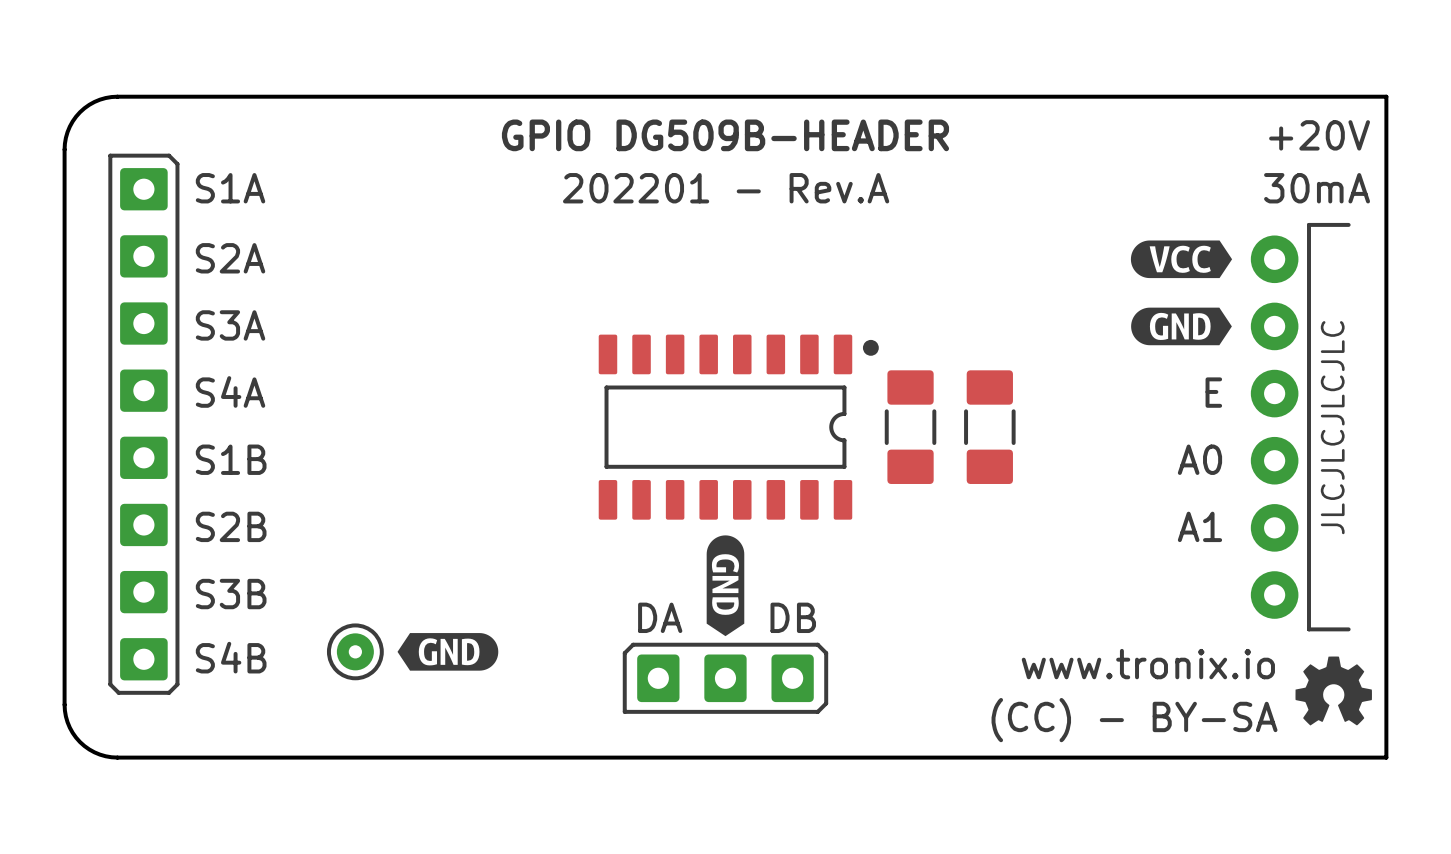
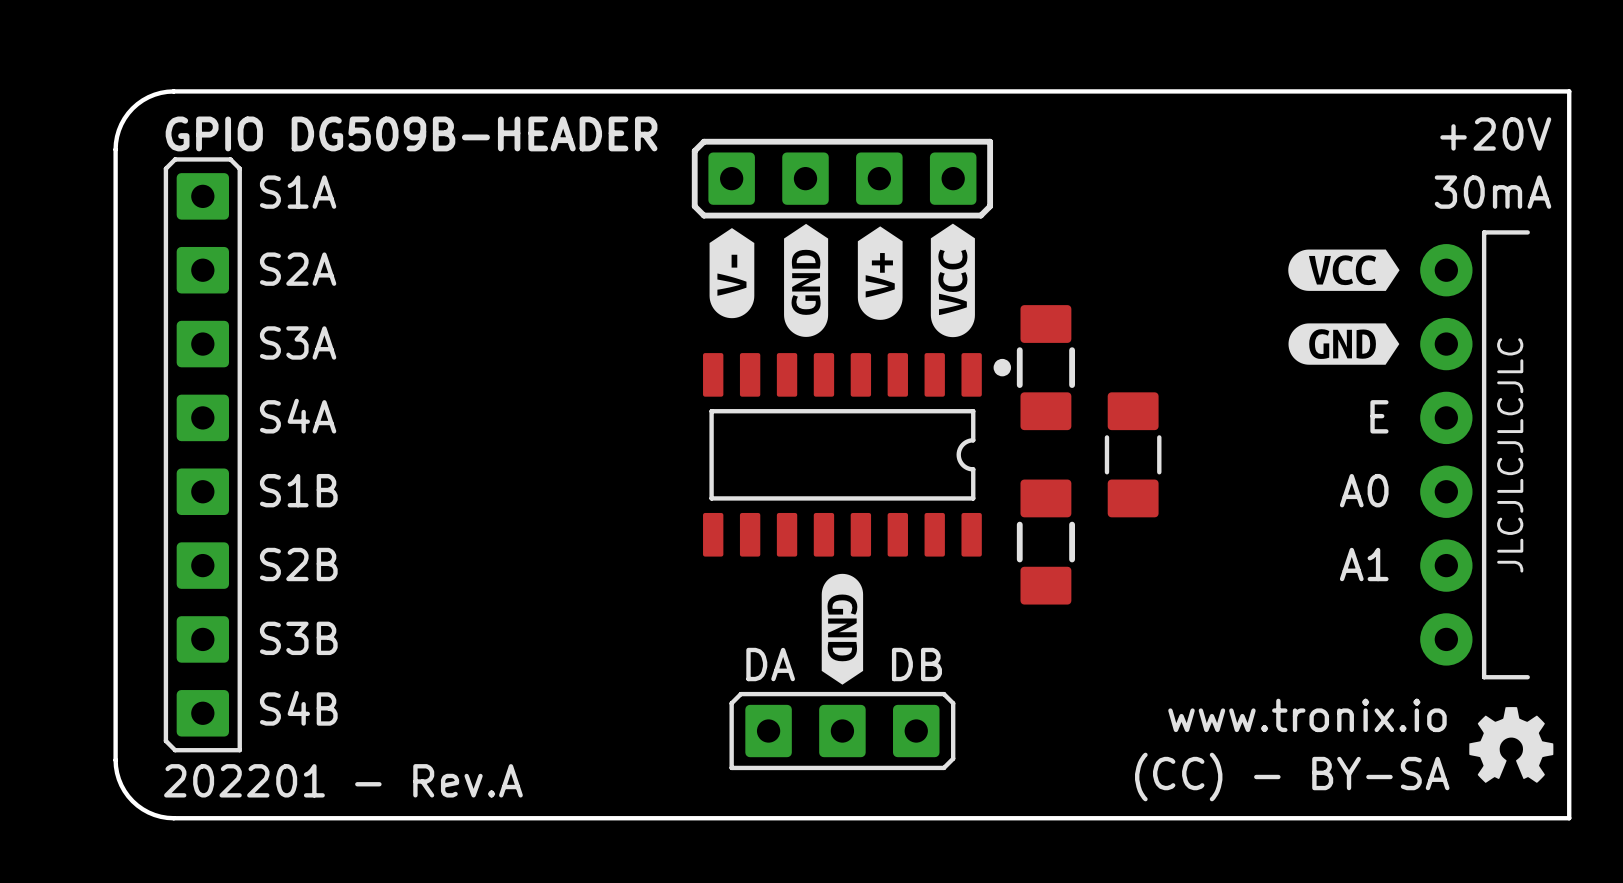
text position: GPIO DG509B-HEADER (725, 135) -> GPIO DG509B-HEADER (411, 133)
part: none -> (842, 178)
text: 202201 - Rev.A (726, 188) -> none
drawing: none -> [709, 223, 975, 338]
part: none -> (1045, 367)
part rotation: 0° (143, 424) -> 180° (202, 454)
part: (910, 427) -> none
part: none -> (1045, 542)
drawing: [397, 633, 499, 671] -> none
part: (355, 651) -> none
text: none -> 202201 - Rev.A (343, 780)

